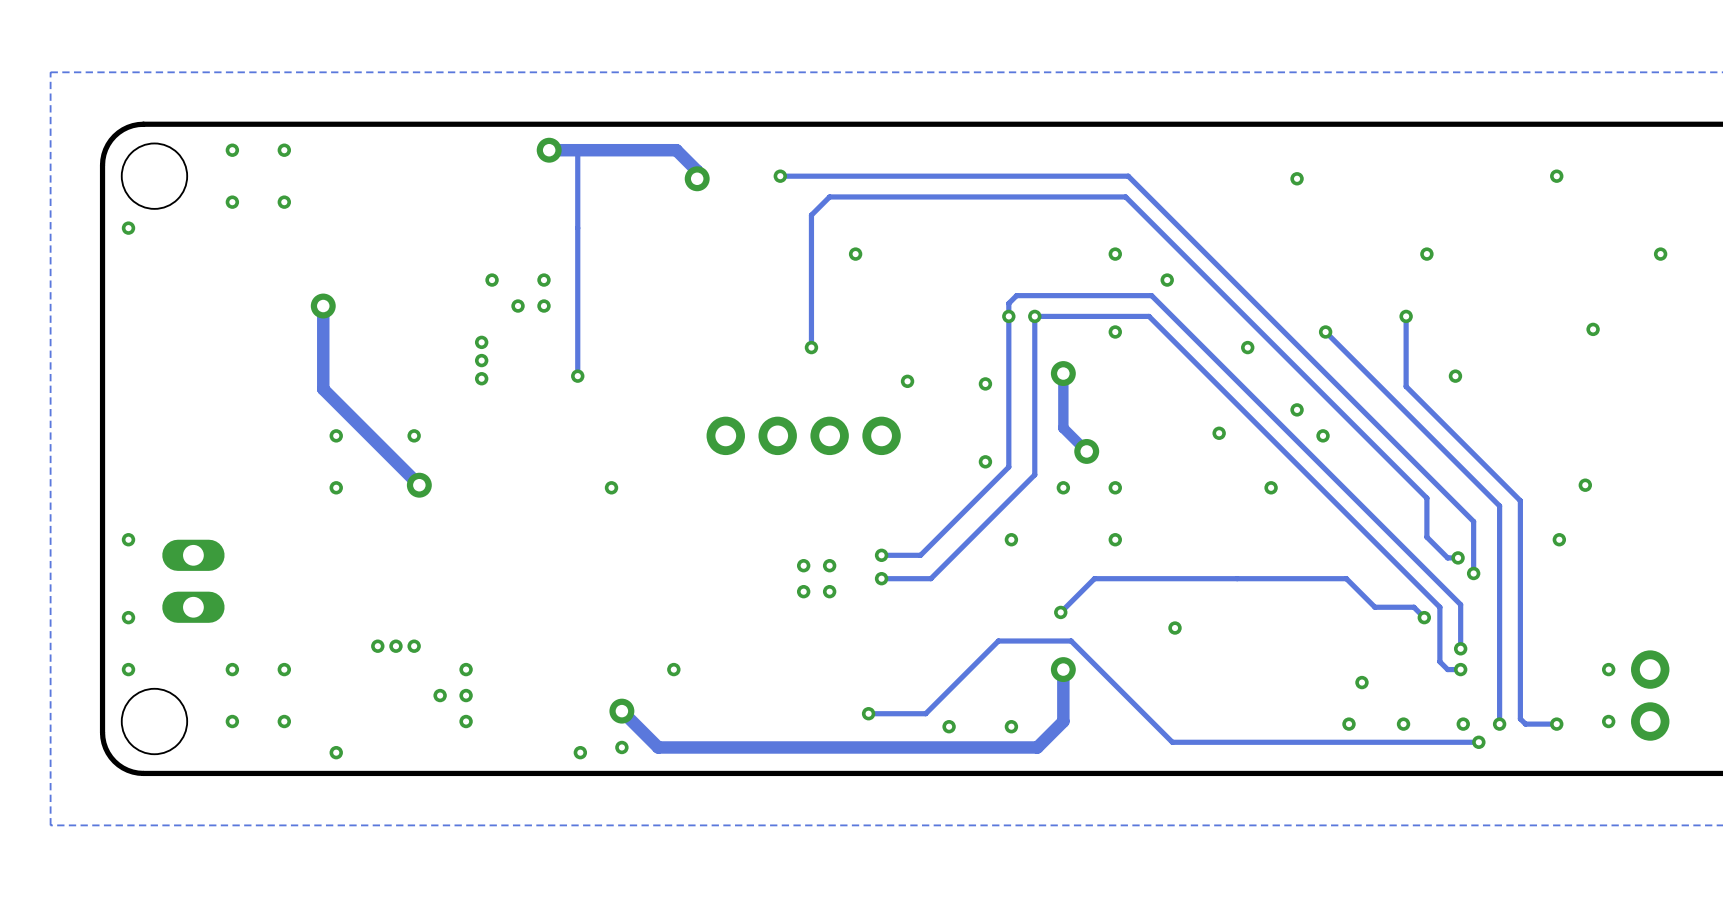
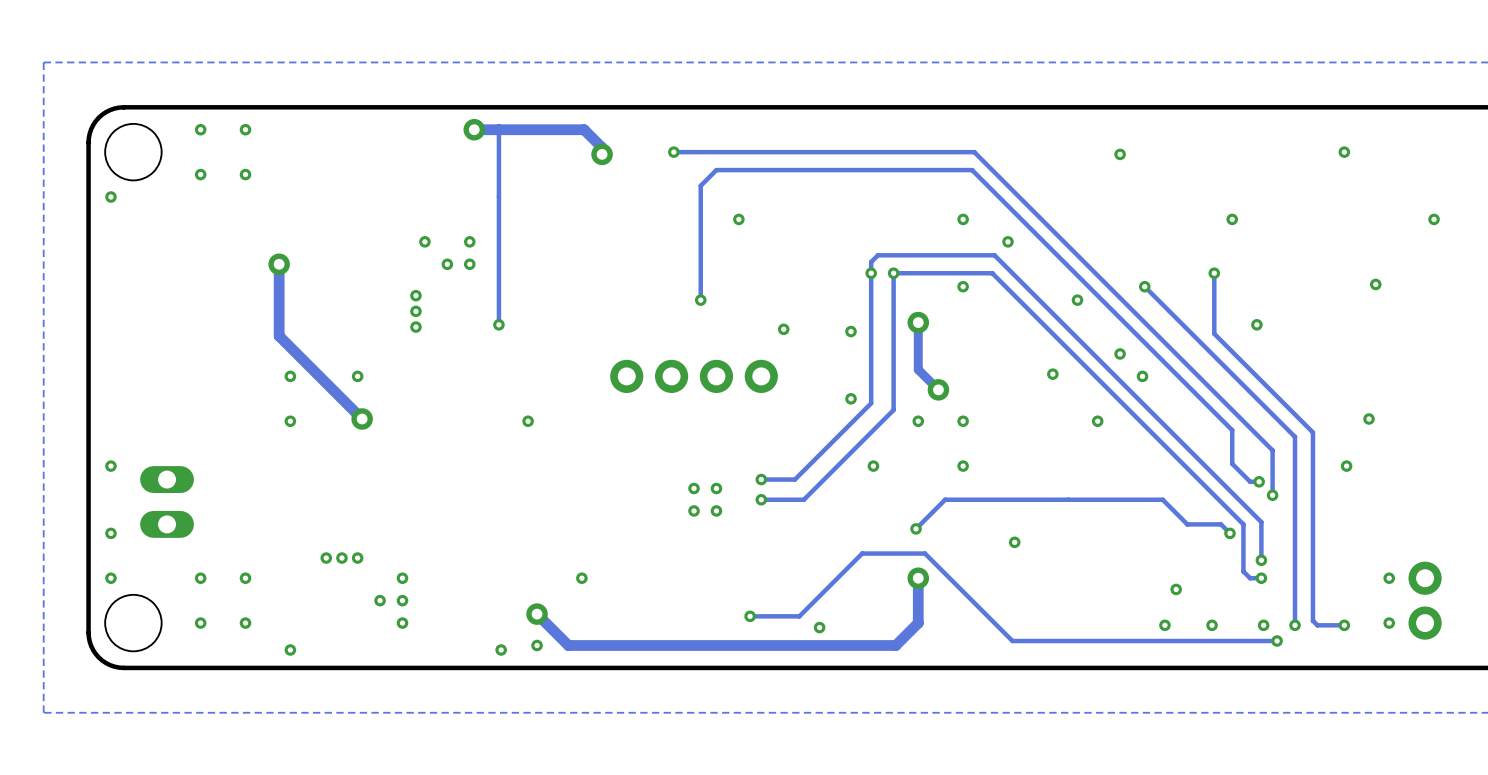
via: (1011, 726) -> none

